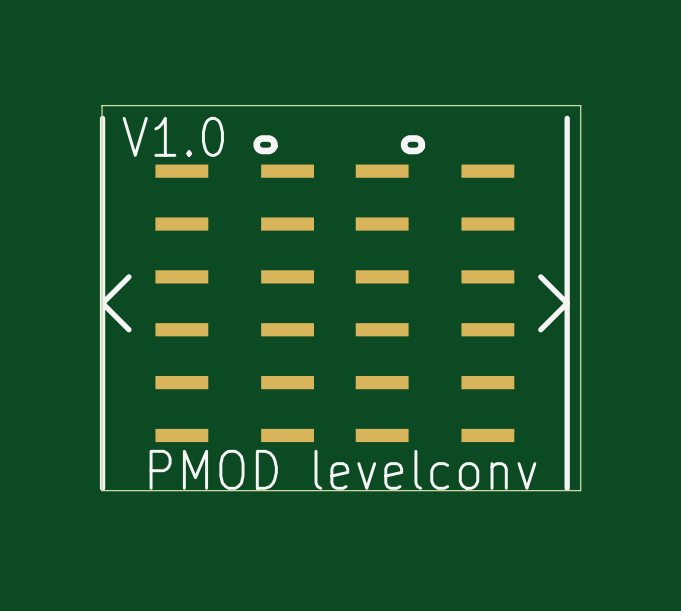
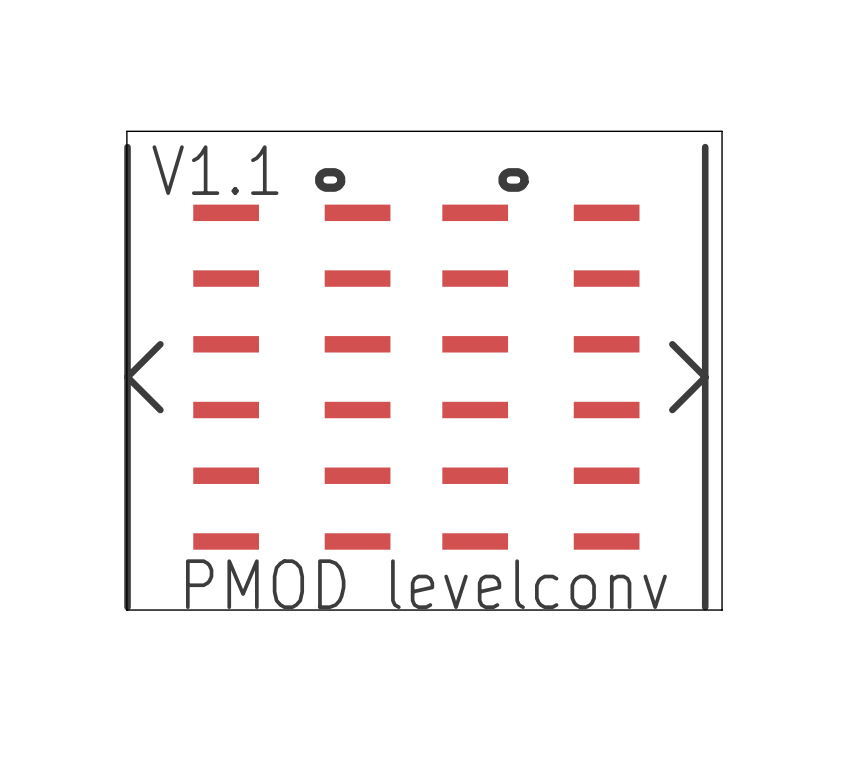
text: V1.0 (173, 136) -> V1.1 (215, 170)

